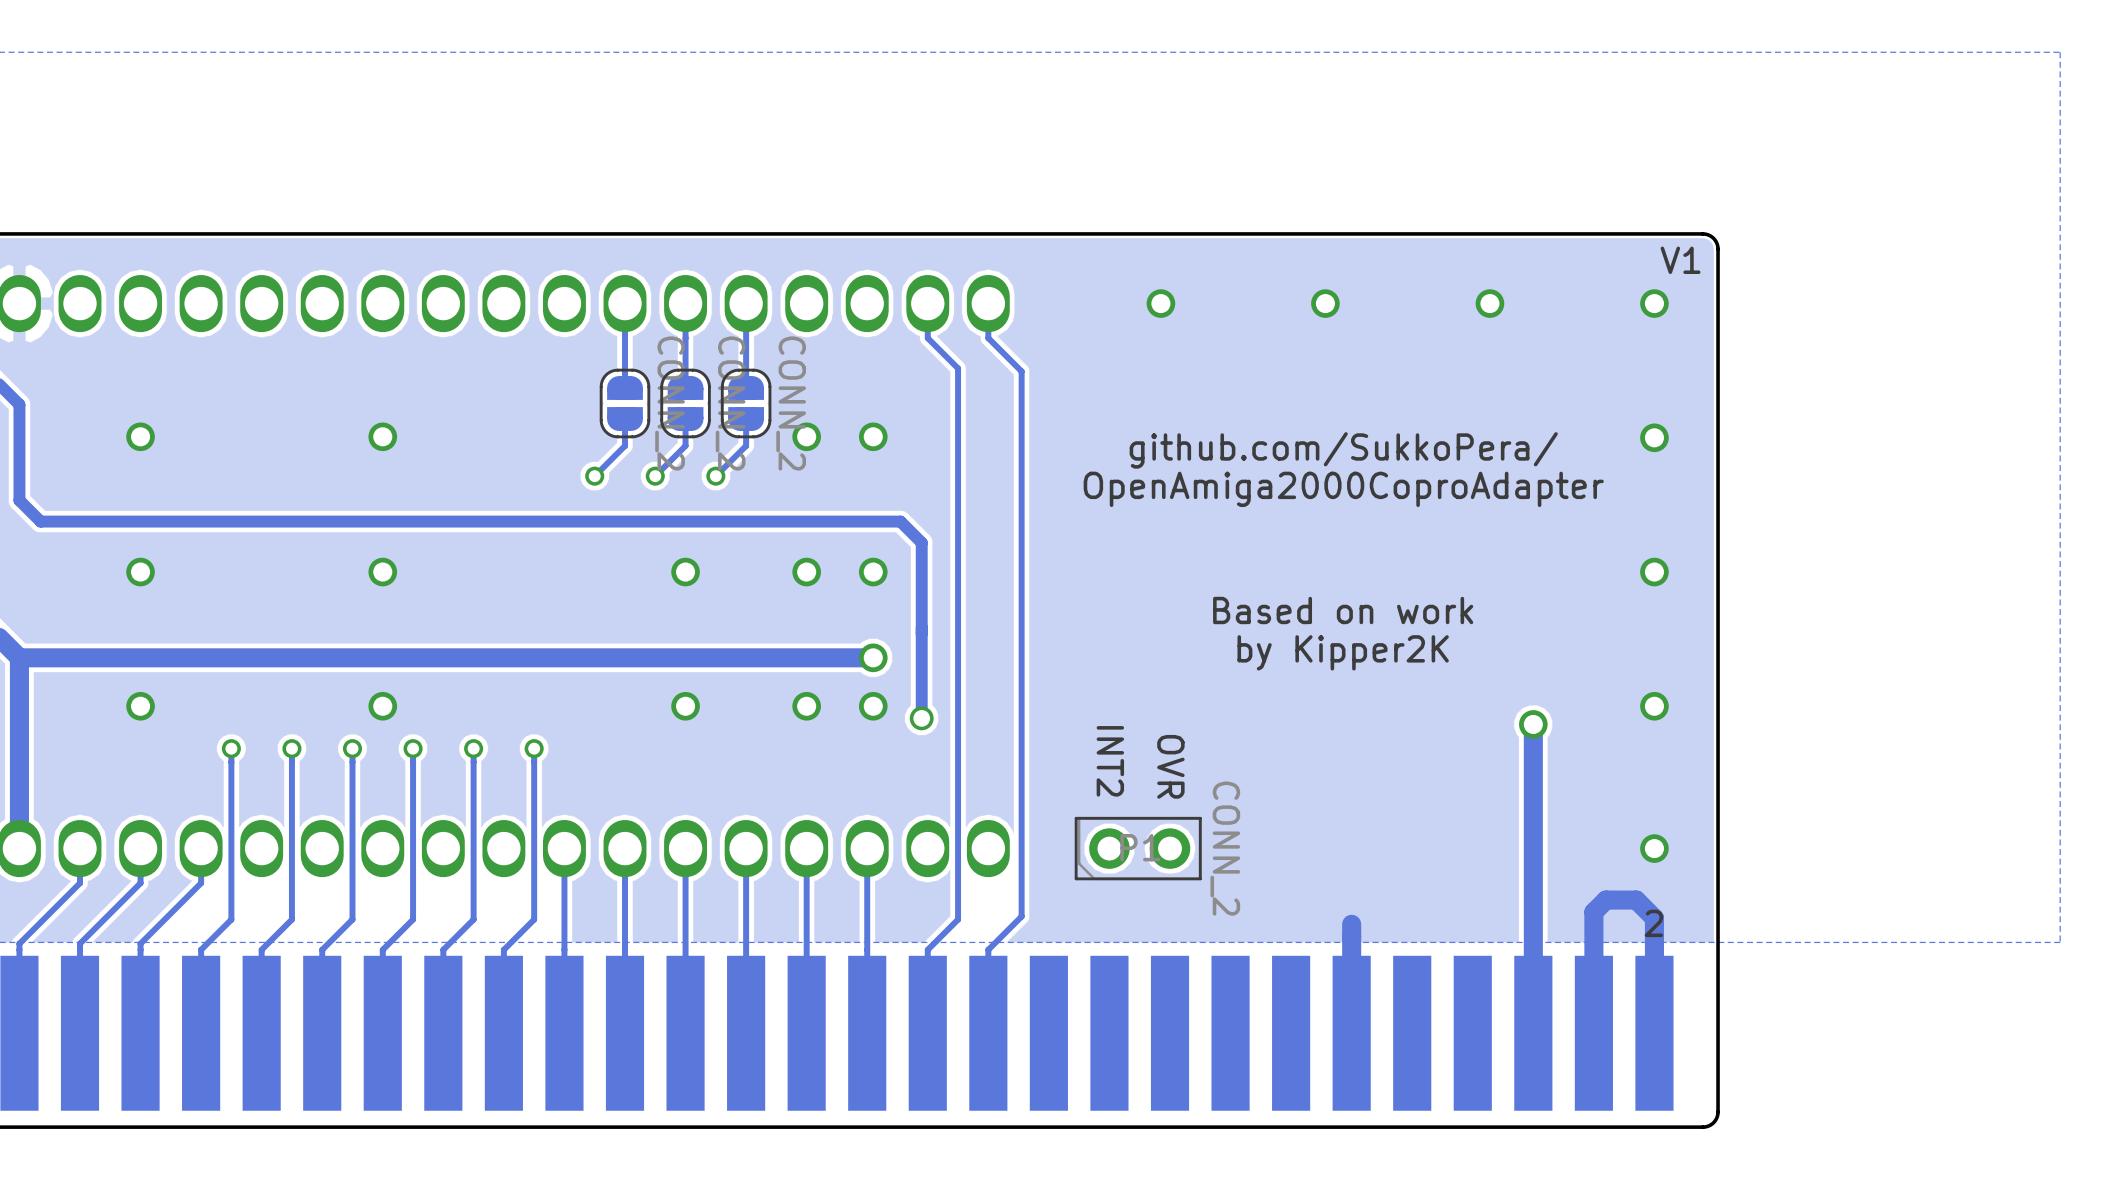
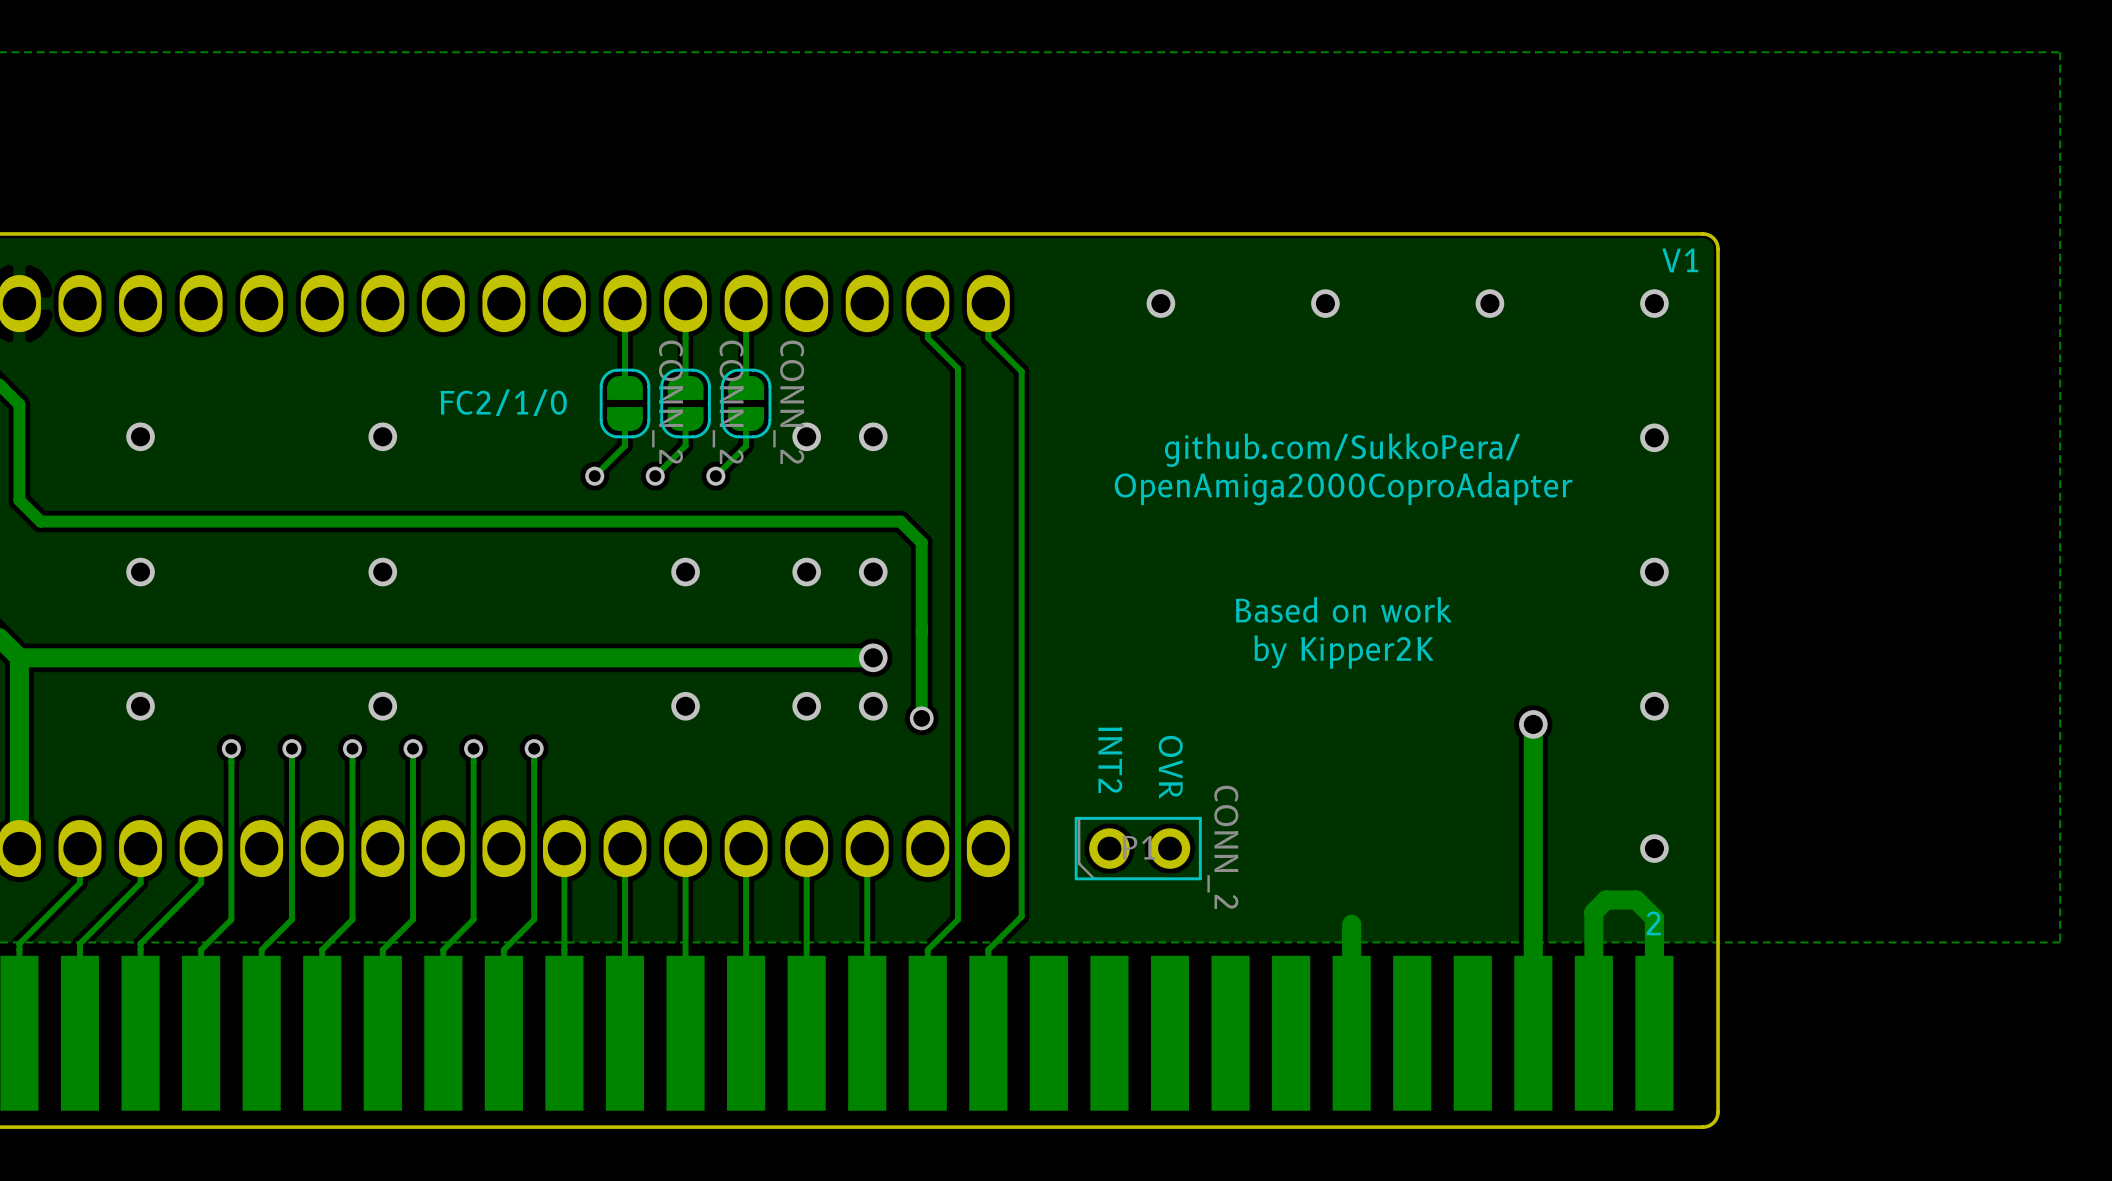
text: none -> FC2/1/0 (503, 402)

